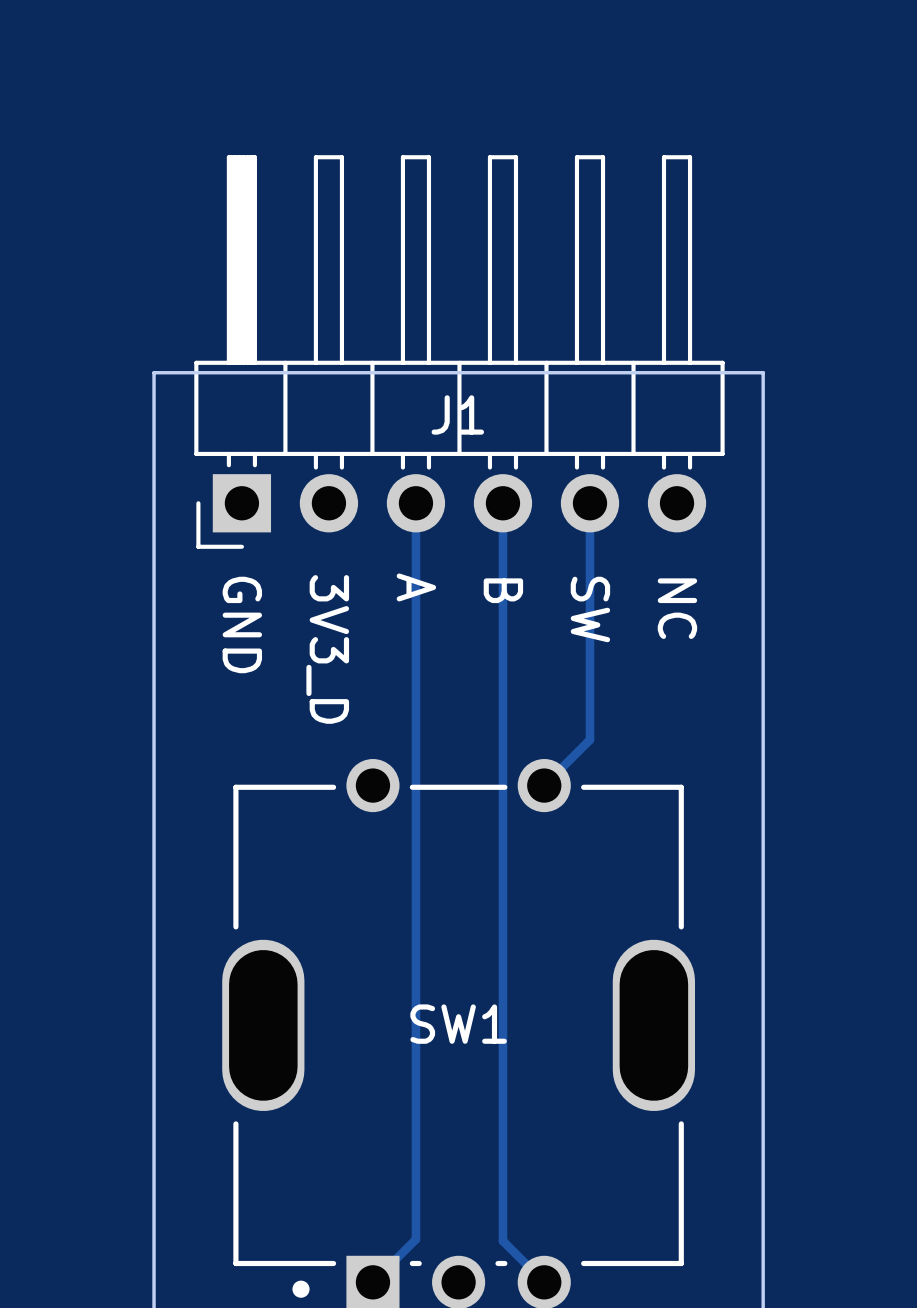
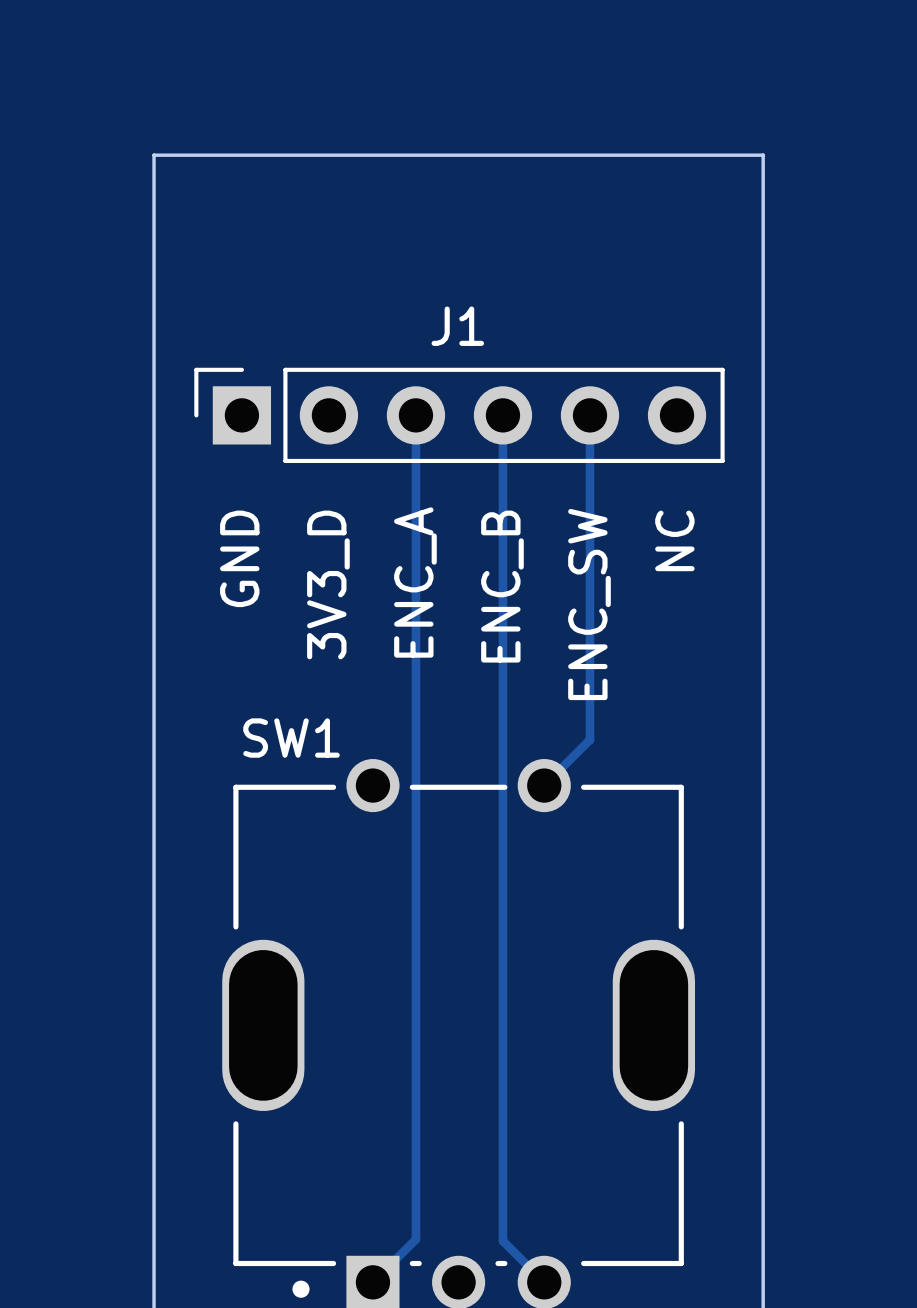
J1 footprint: [194, 155, 725, 549] -> [194, 367, 725, 464]
board edge: (154, 372) (763, 372) -> (154, 372) (154, 155) (763, 155) (763, 372)
J1 name position: J1 (457, 414) -> J1 (457, 326)
track: none -> (415, 417) (415, 503)
track: none -> (502, 417) (502, 503)
track: none -> (589, 417) (589, 503)
text: none -> ENC_A (415, 582)
text: none -> ENC_B (502, 586)
text: A (416, 587) -> none
text: B (503, 590) -> none
text: none -> ENC_SW (589, 604)
text rotation: 0° (677, 608) -> 180° (674, 540)
text: SW (590, 609) -> none
text rotation: 0° (242, 624) -> 180° (239, 558)
text rotation: 0° (327, 649) -> 180° (328, 584)
SW1 name position: SW1 (458, 1024) -> SW1 (291, 738)

